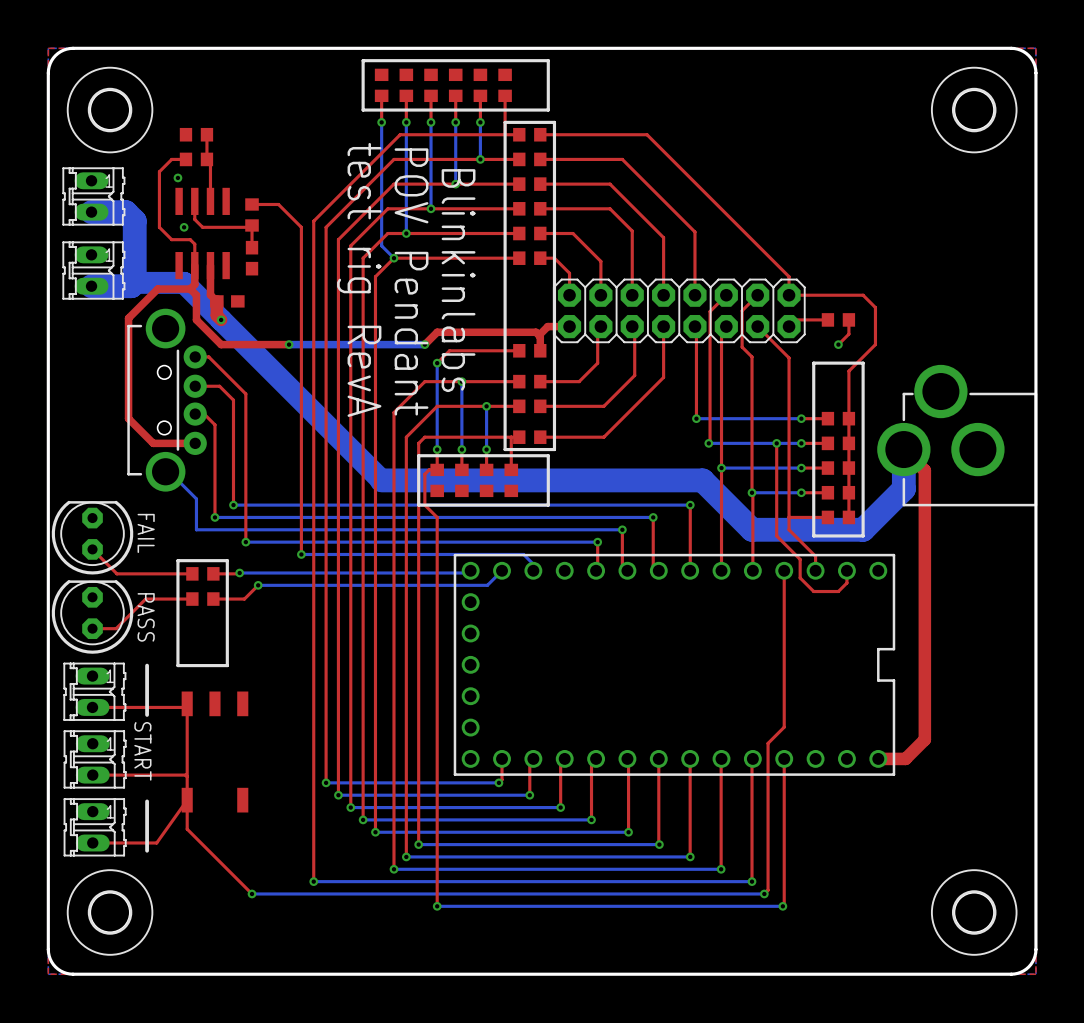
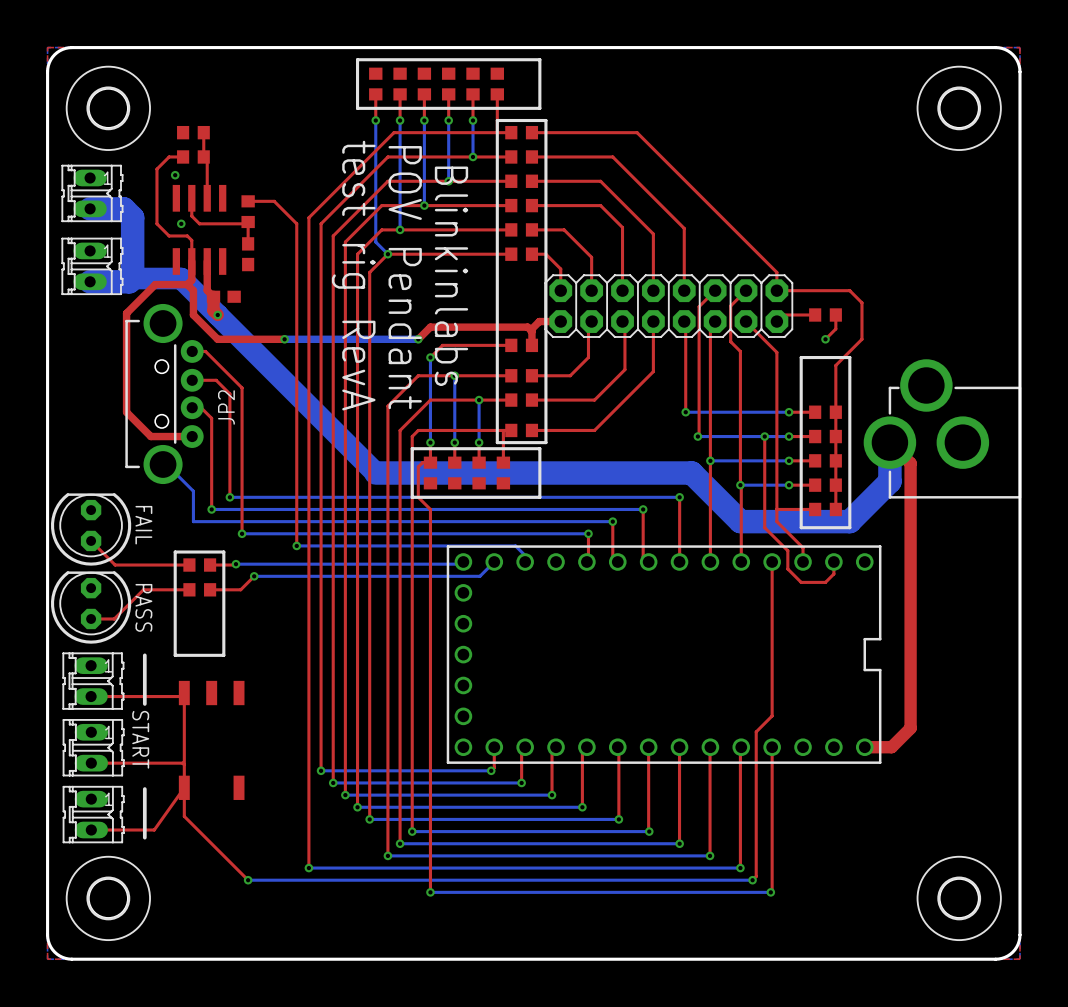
JP2 name: none -> JP2 (226, 407)

